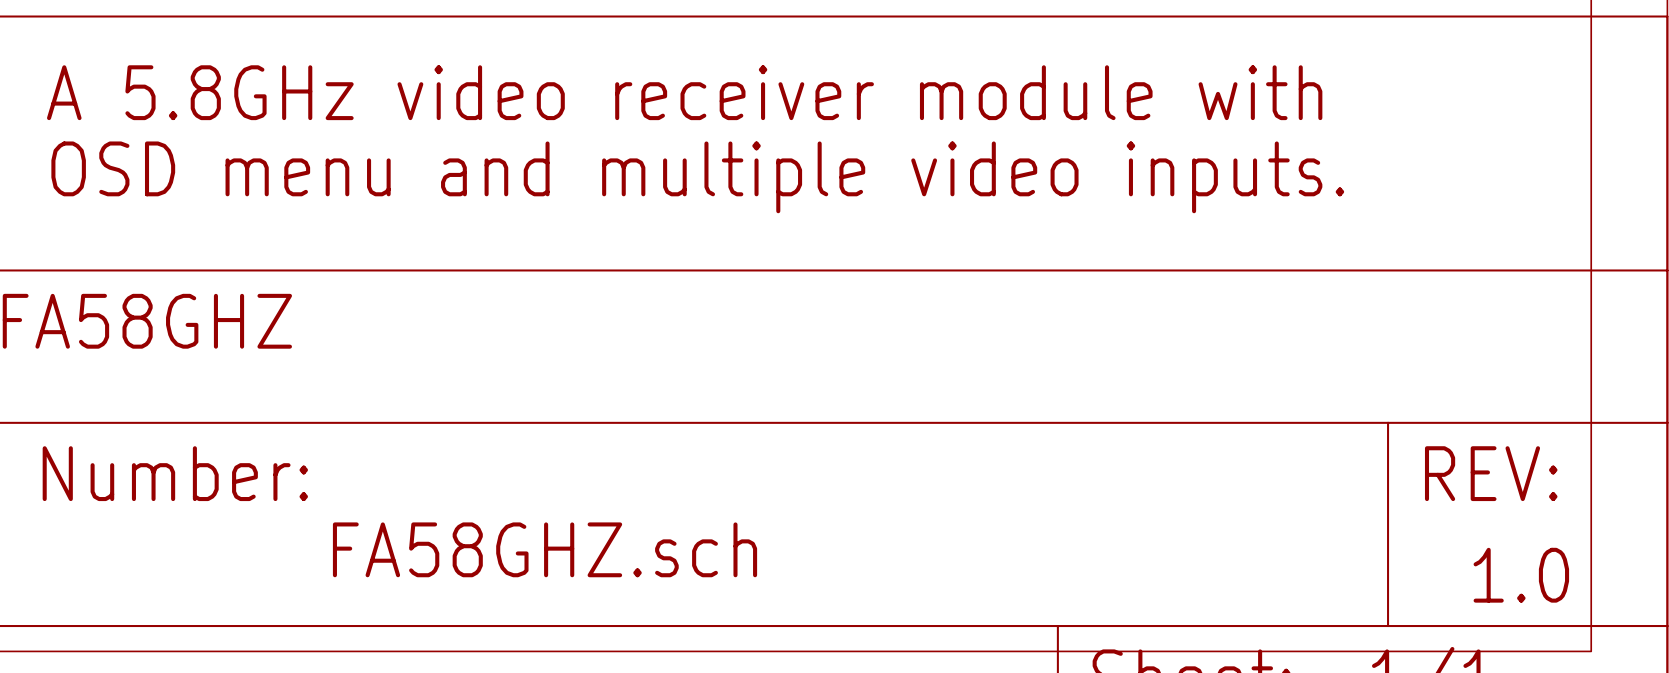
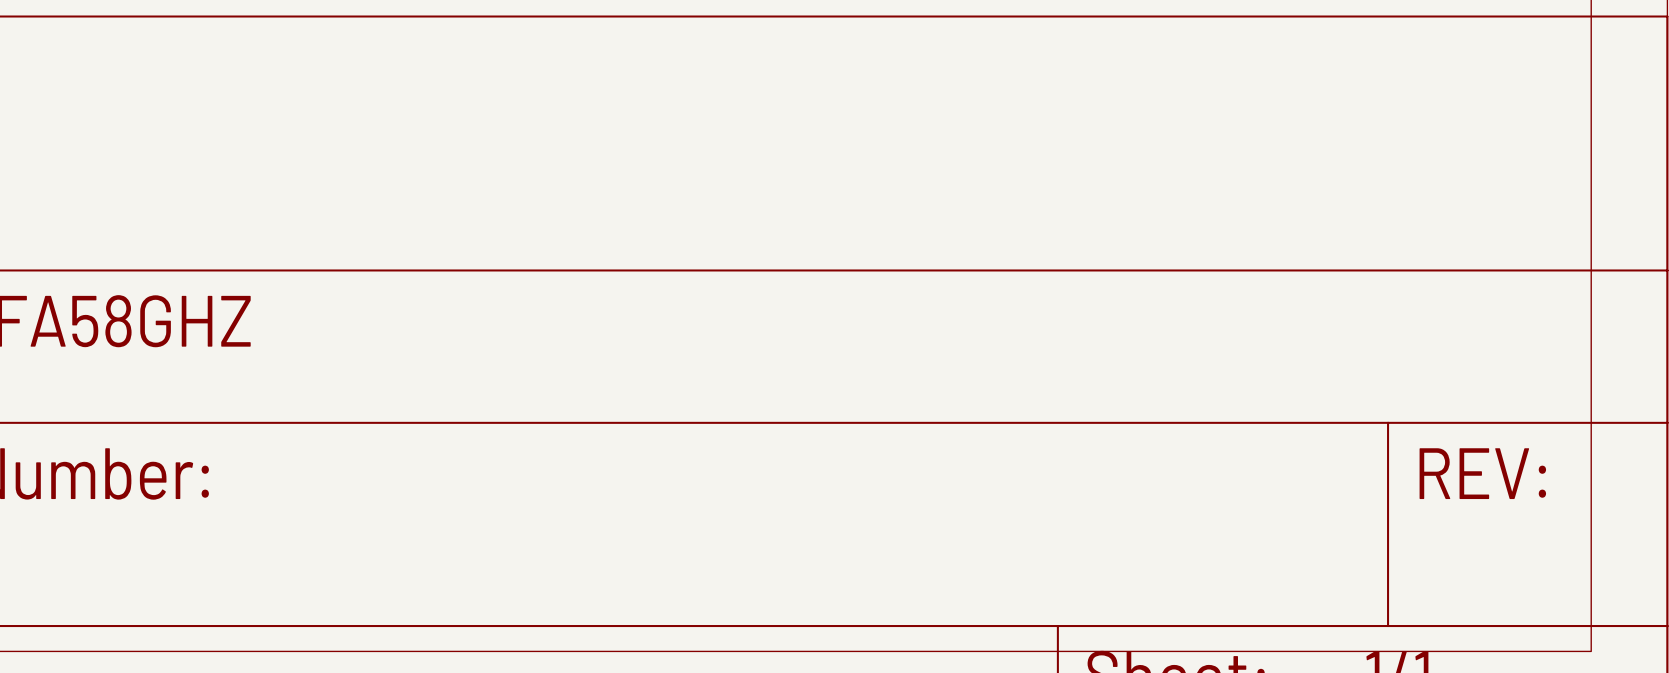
text: A 5.8GHz video receiver module with (684, 92) -> none
text: OSD menu and multiple video inputs. (697, 177) -> none
text: FA58GHZ.sch (545, 549) -> none
text: 1.0 (1521, 575) -> none

